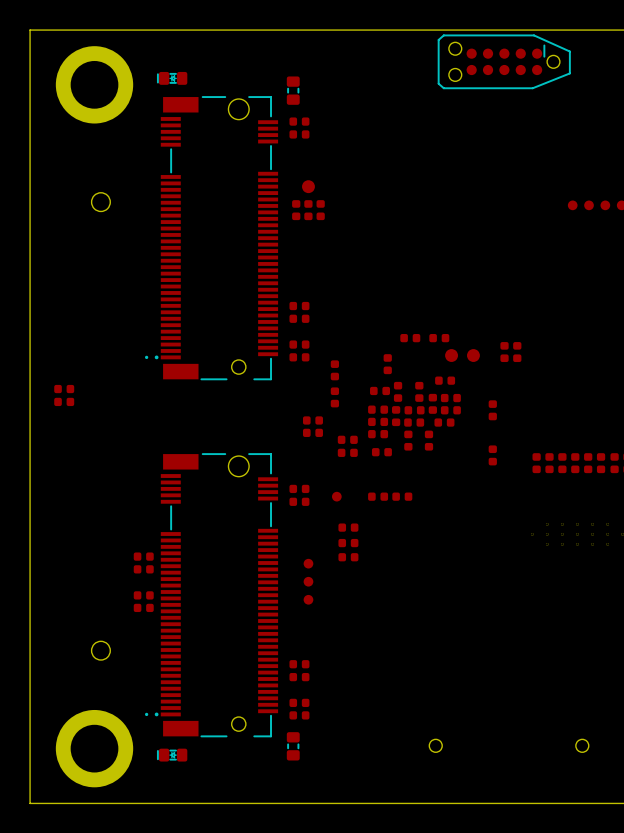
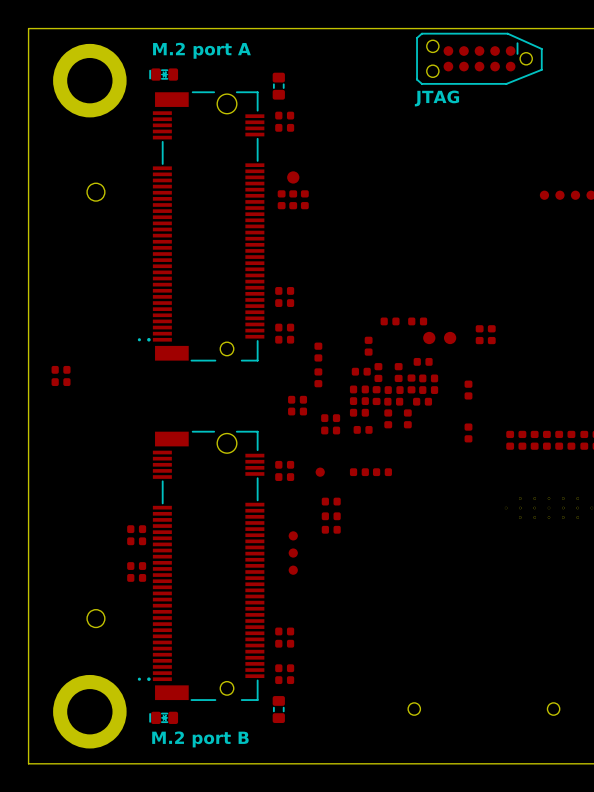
text: none -> M.2 port A (201, 50)
text: none -> JTAG (436, 98)
text: none -> M.2 port B (200, 739)

